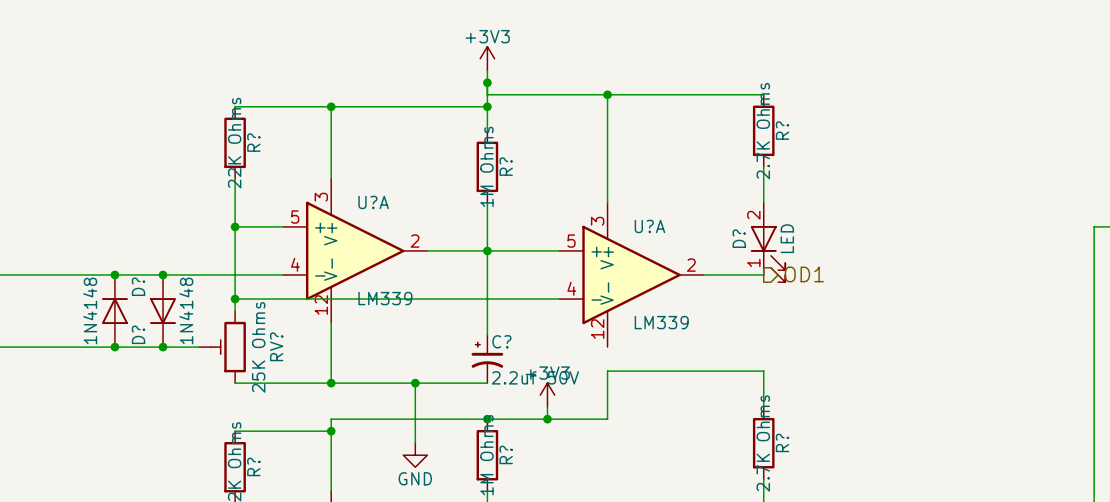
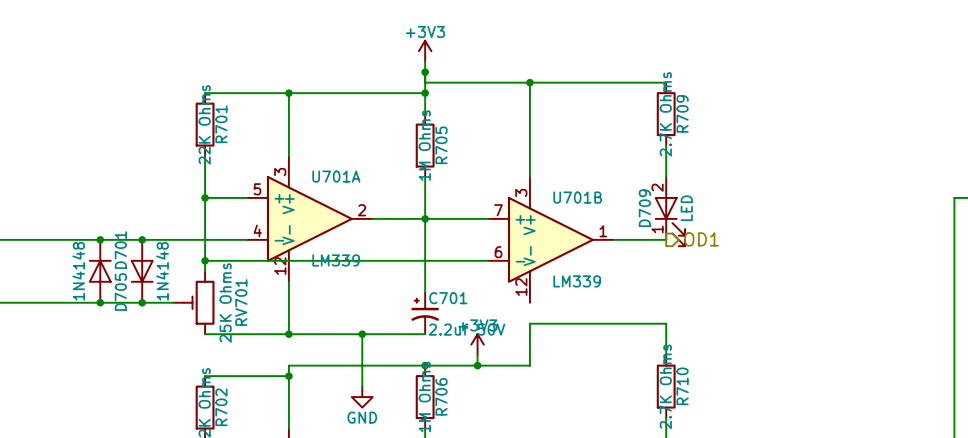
R? name: R? (782, 130) -> R709 (682, 113)
R? name: R? (253, 142) -> R701 (221, 124)
R? name: R? (506, 166) -> R705 (441, 145)
U?A name: U?A (373, 202) -> U701A (336, 176)
U?A name: U?A (649, 226) -> U701B (577, 197)
D? name: D? (739, 238) -> D709 (644, 208)
U?A pin number: 5 (571, 241) -> 7 (498, 210)
U?A pin number: 2 (691, 265) -> 1 (603, 231)
D? name: D? (138, 286) -> D701 (120, 250)
U?A pin number: 4 (571, 288) -> 6 (498, 252)
D? name: D? (138, 334) -> D705 (120, 292)
C? name: C? (501, 341) -> C701 (448, 298)
RV? name: RV? (276, 346) -> RV701 (241, 302)
R? name: R? (782, 442) -> R710 (682, 386)
R? name: R? (506, 454) -> R706 (441, 396)
R? name: R? (253, 466) -> R702 (221, 407)

